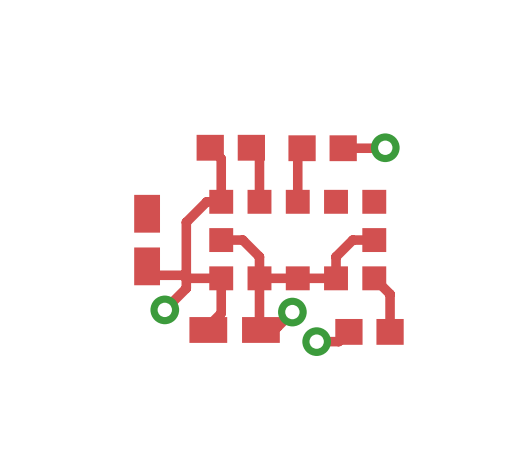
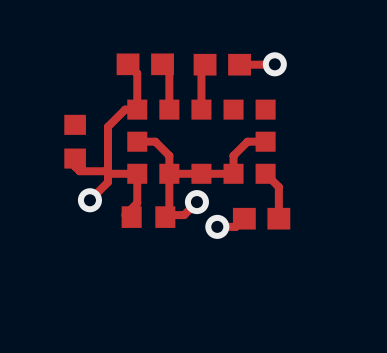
part footprint: [134, 194, 161, 286] -> [64, 114, 86, 169]
part footprint: [189, 317, 280, 343] -> [121, 206, 176, 228]

